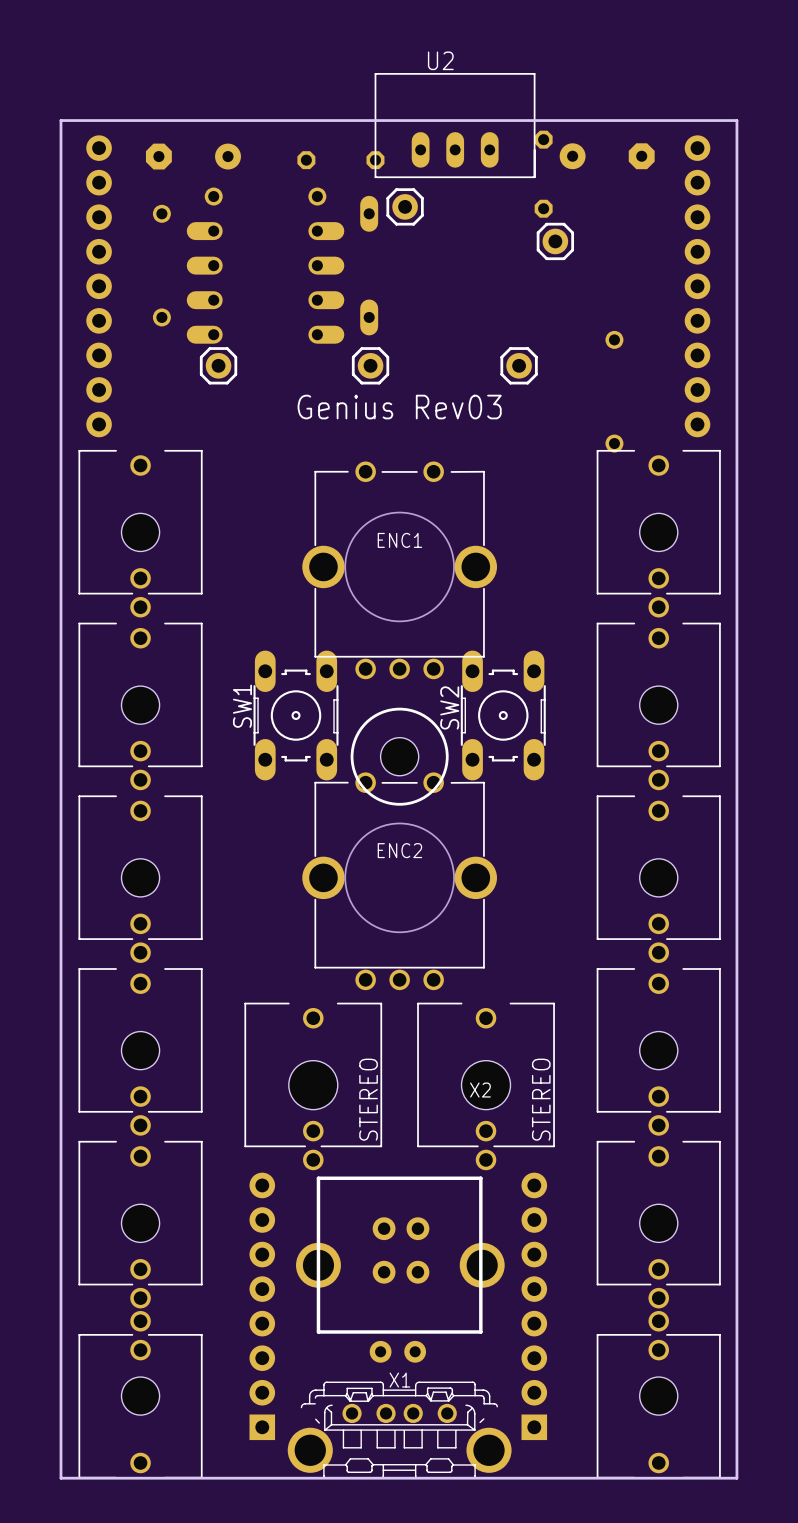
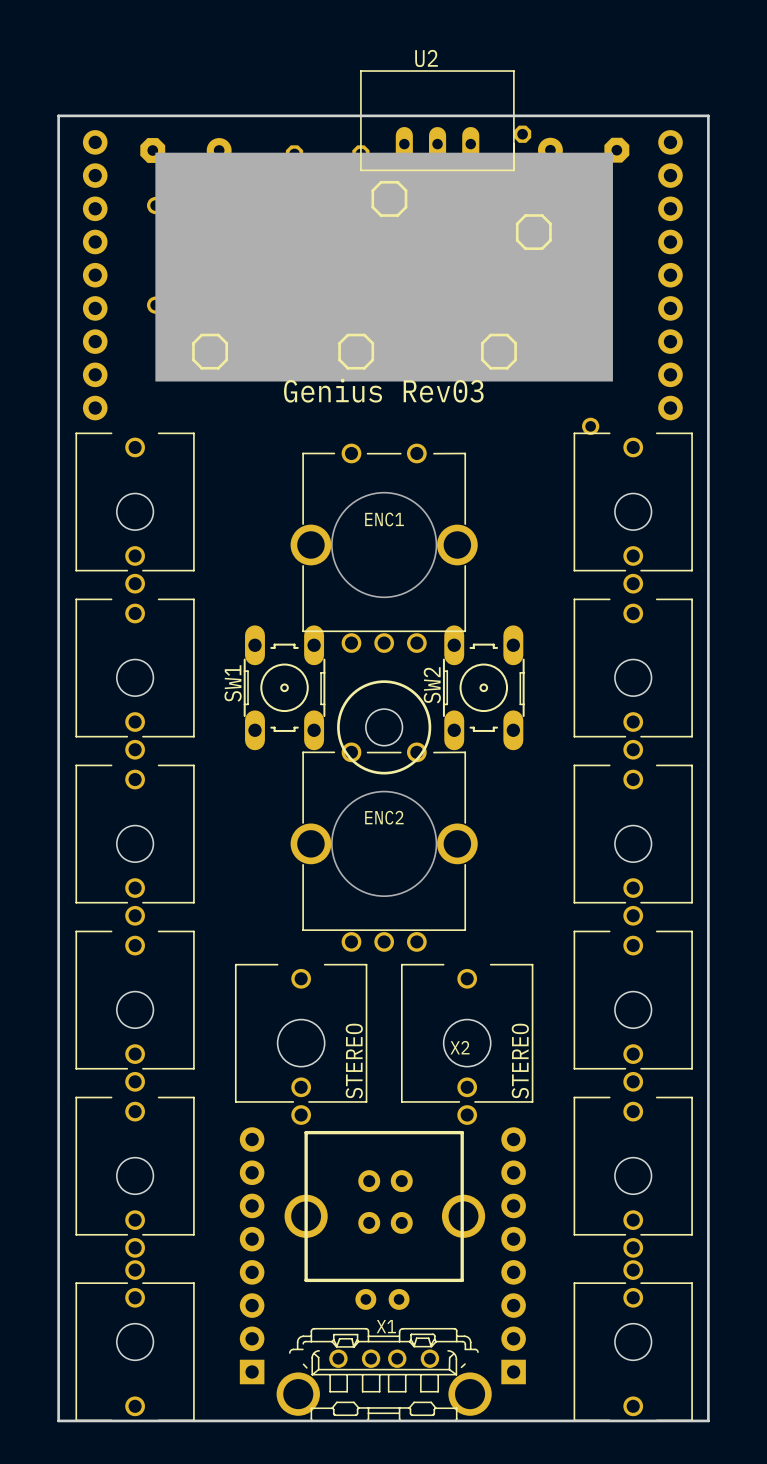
drawing: none -> [155, 152, 613, 382]

